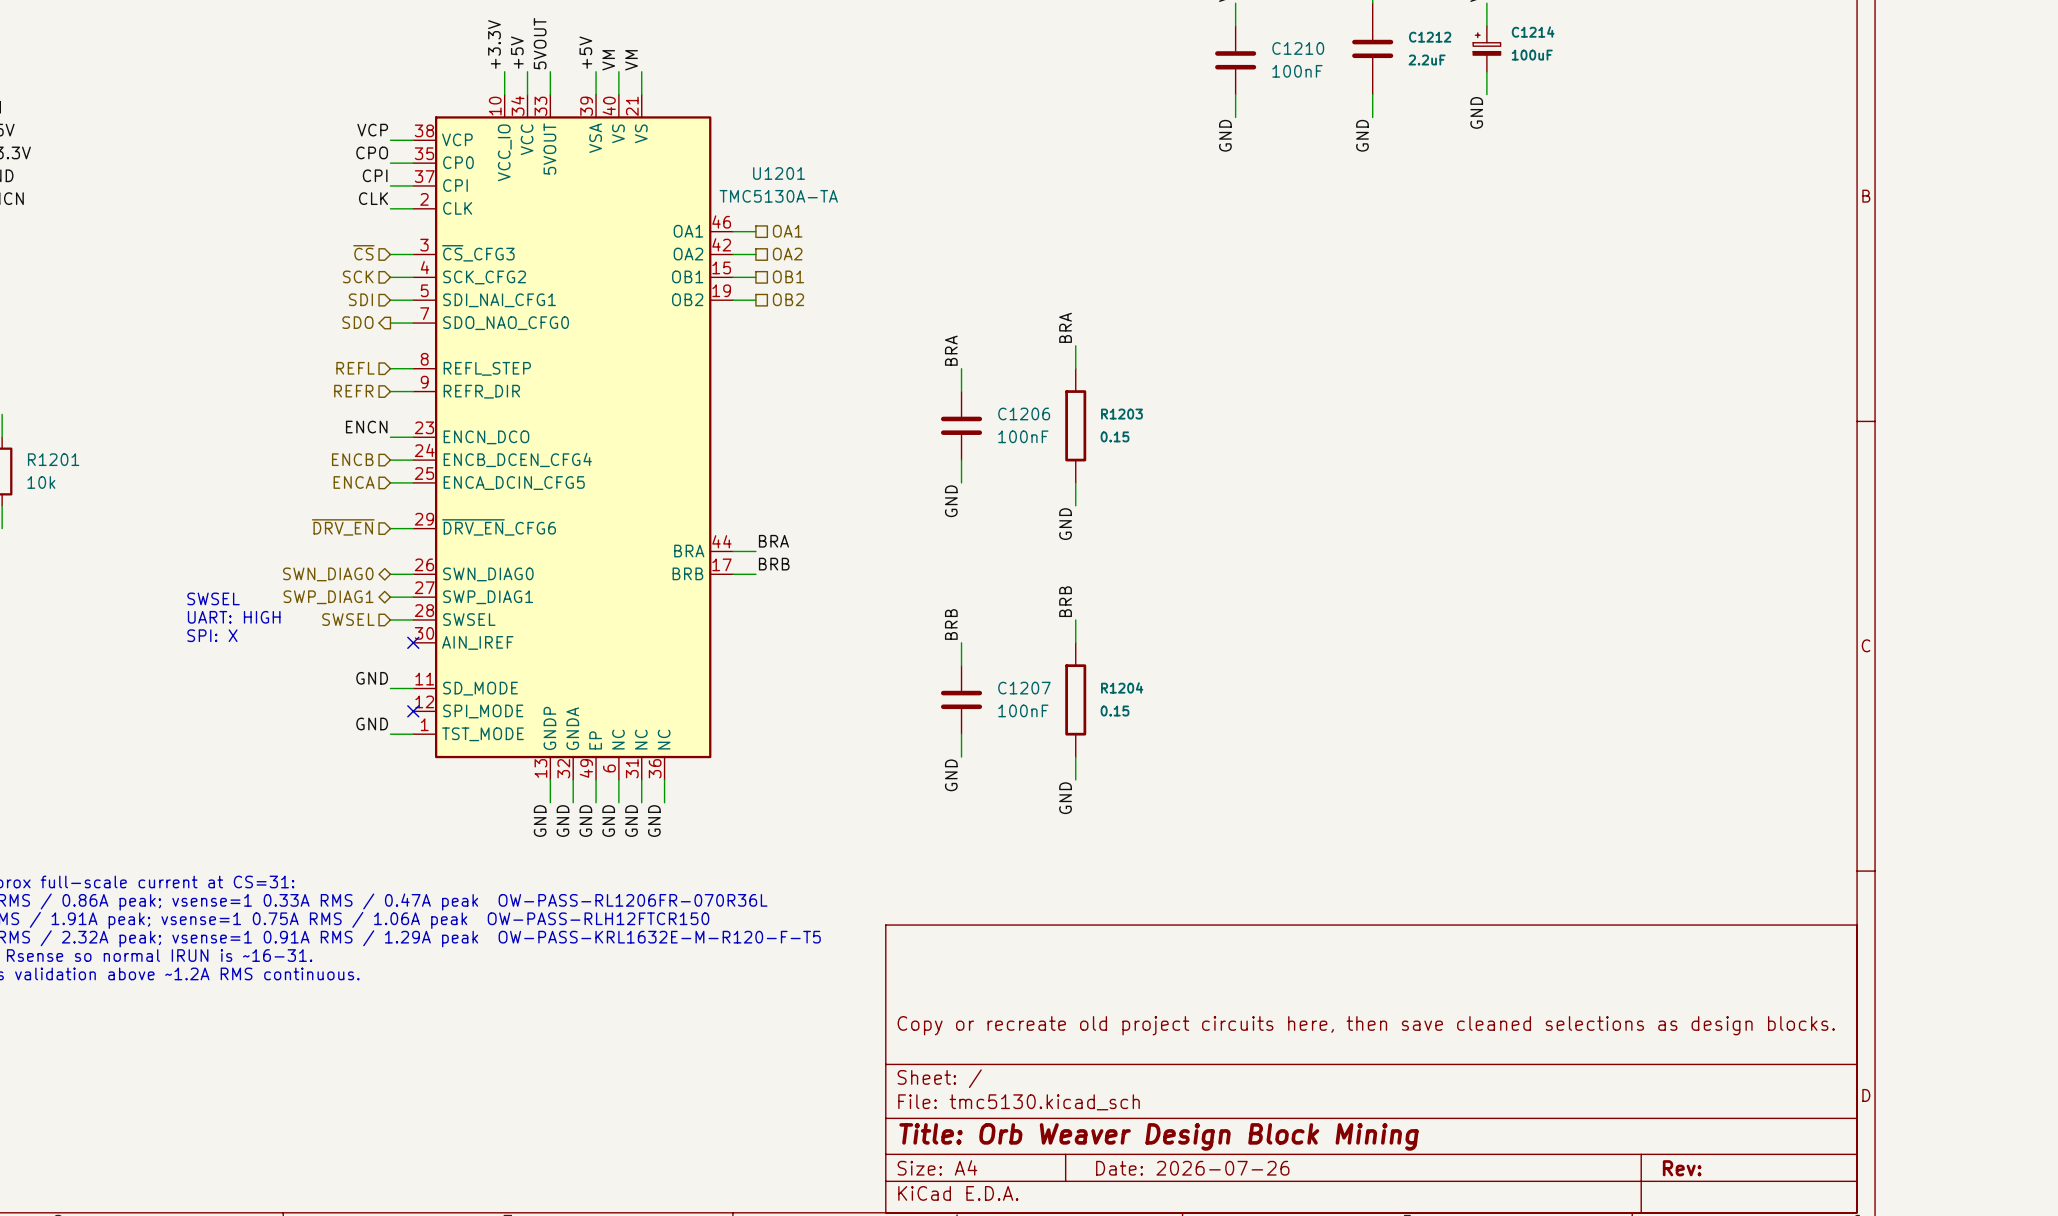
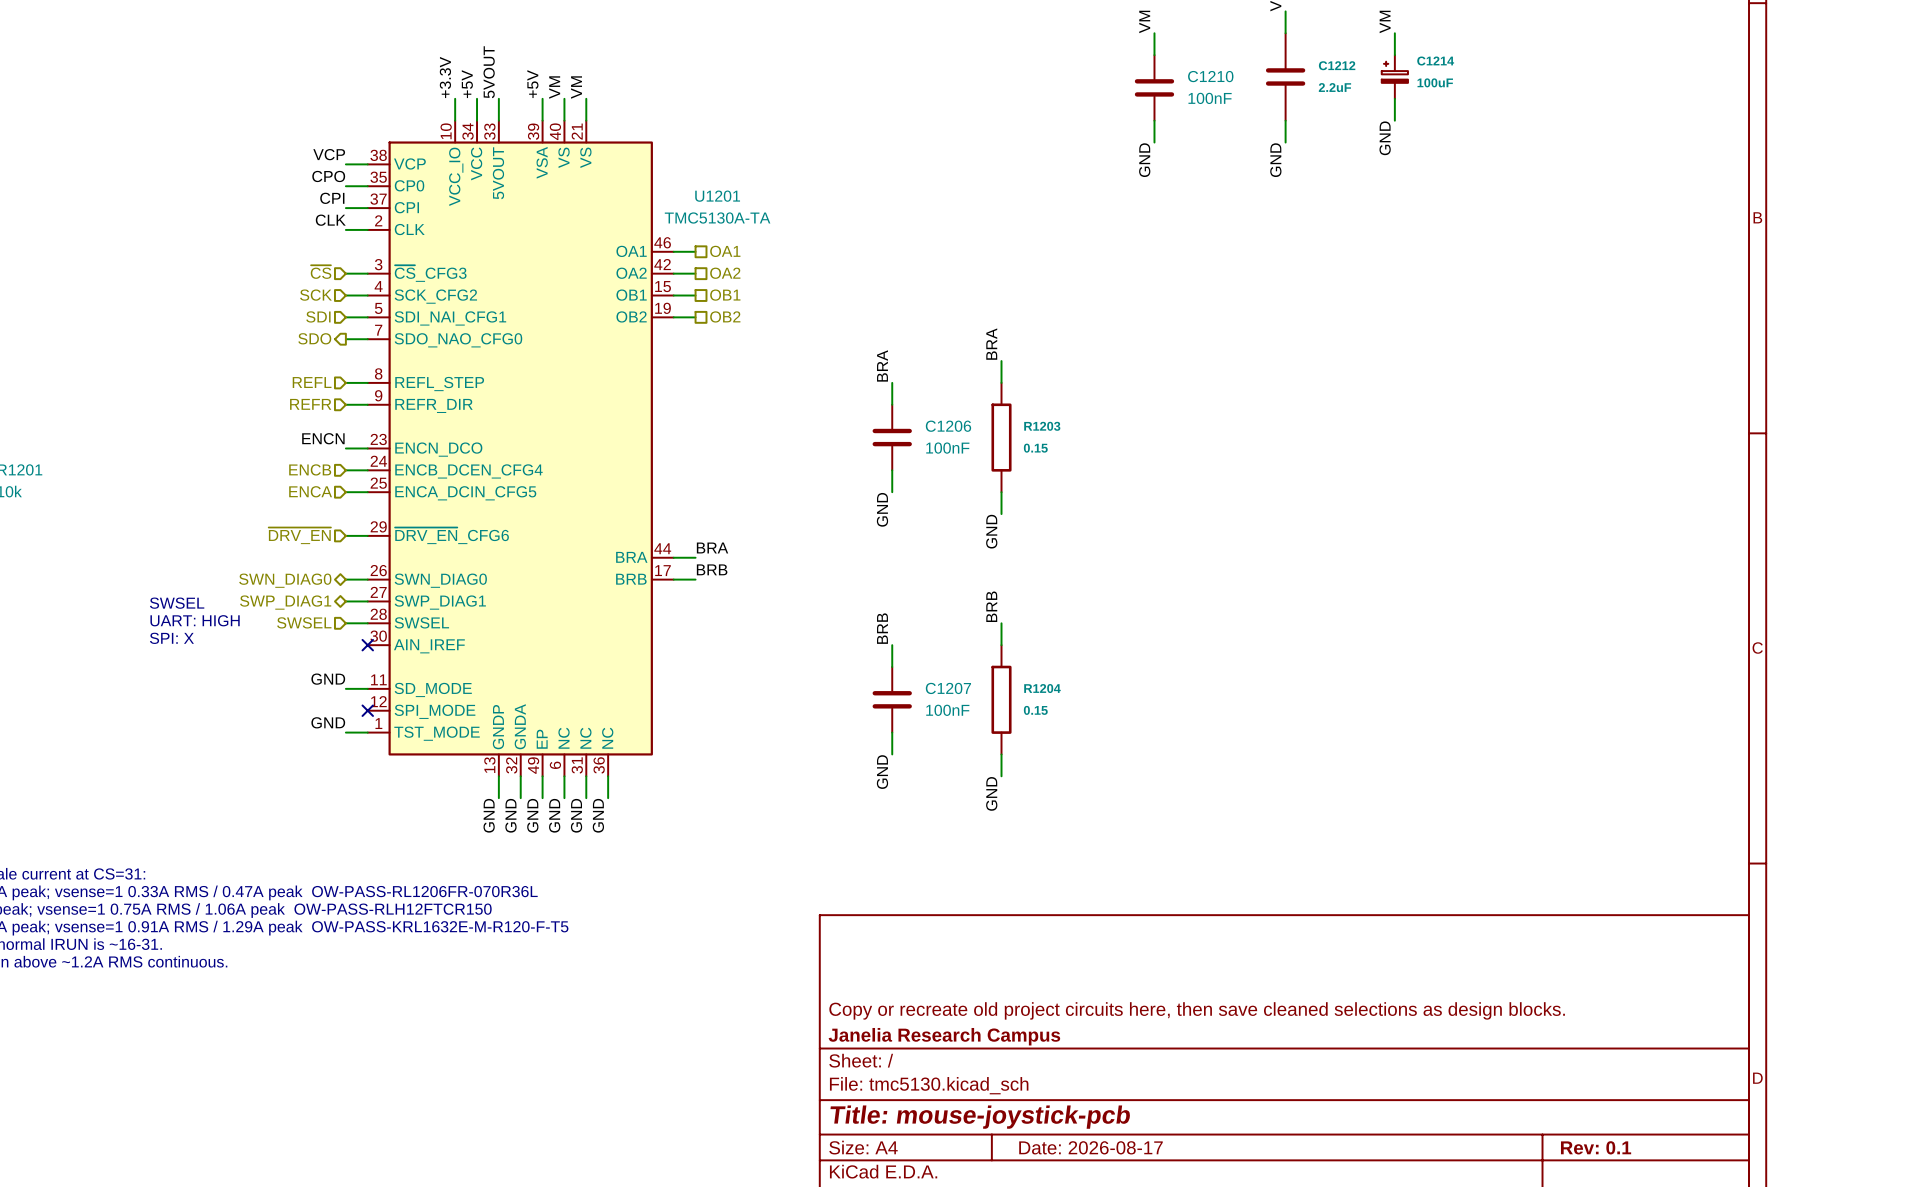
title block: none -> Janelia Research Campus (944, 1036)
title block: Title: Orb Weaver Design Block Mining (1158, 1136) -> Title: mouse-joystick-pcb (980, 1117)
title block: Date: 2026-07-26 (1192, 1168) -> Date: 2026-08-17 (1090, 1147)
title block: Rev: (1682, 1168) -> Rev: 0.1 (1596, 1147)

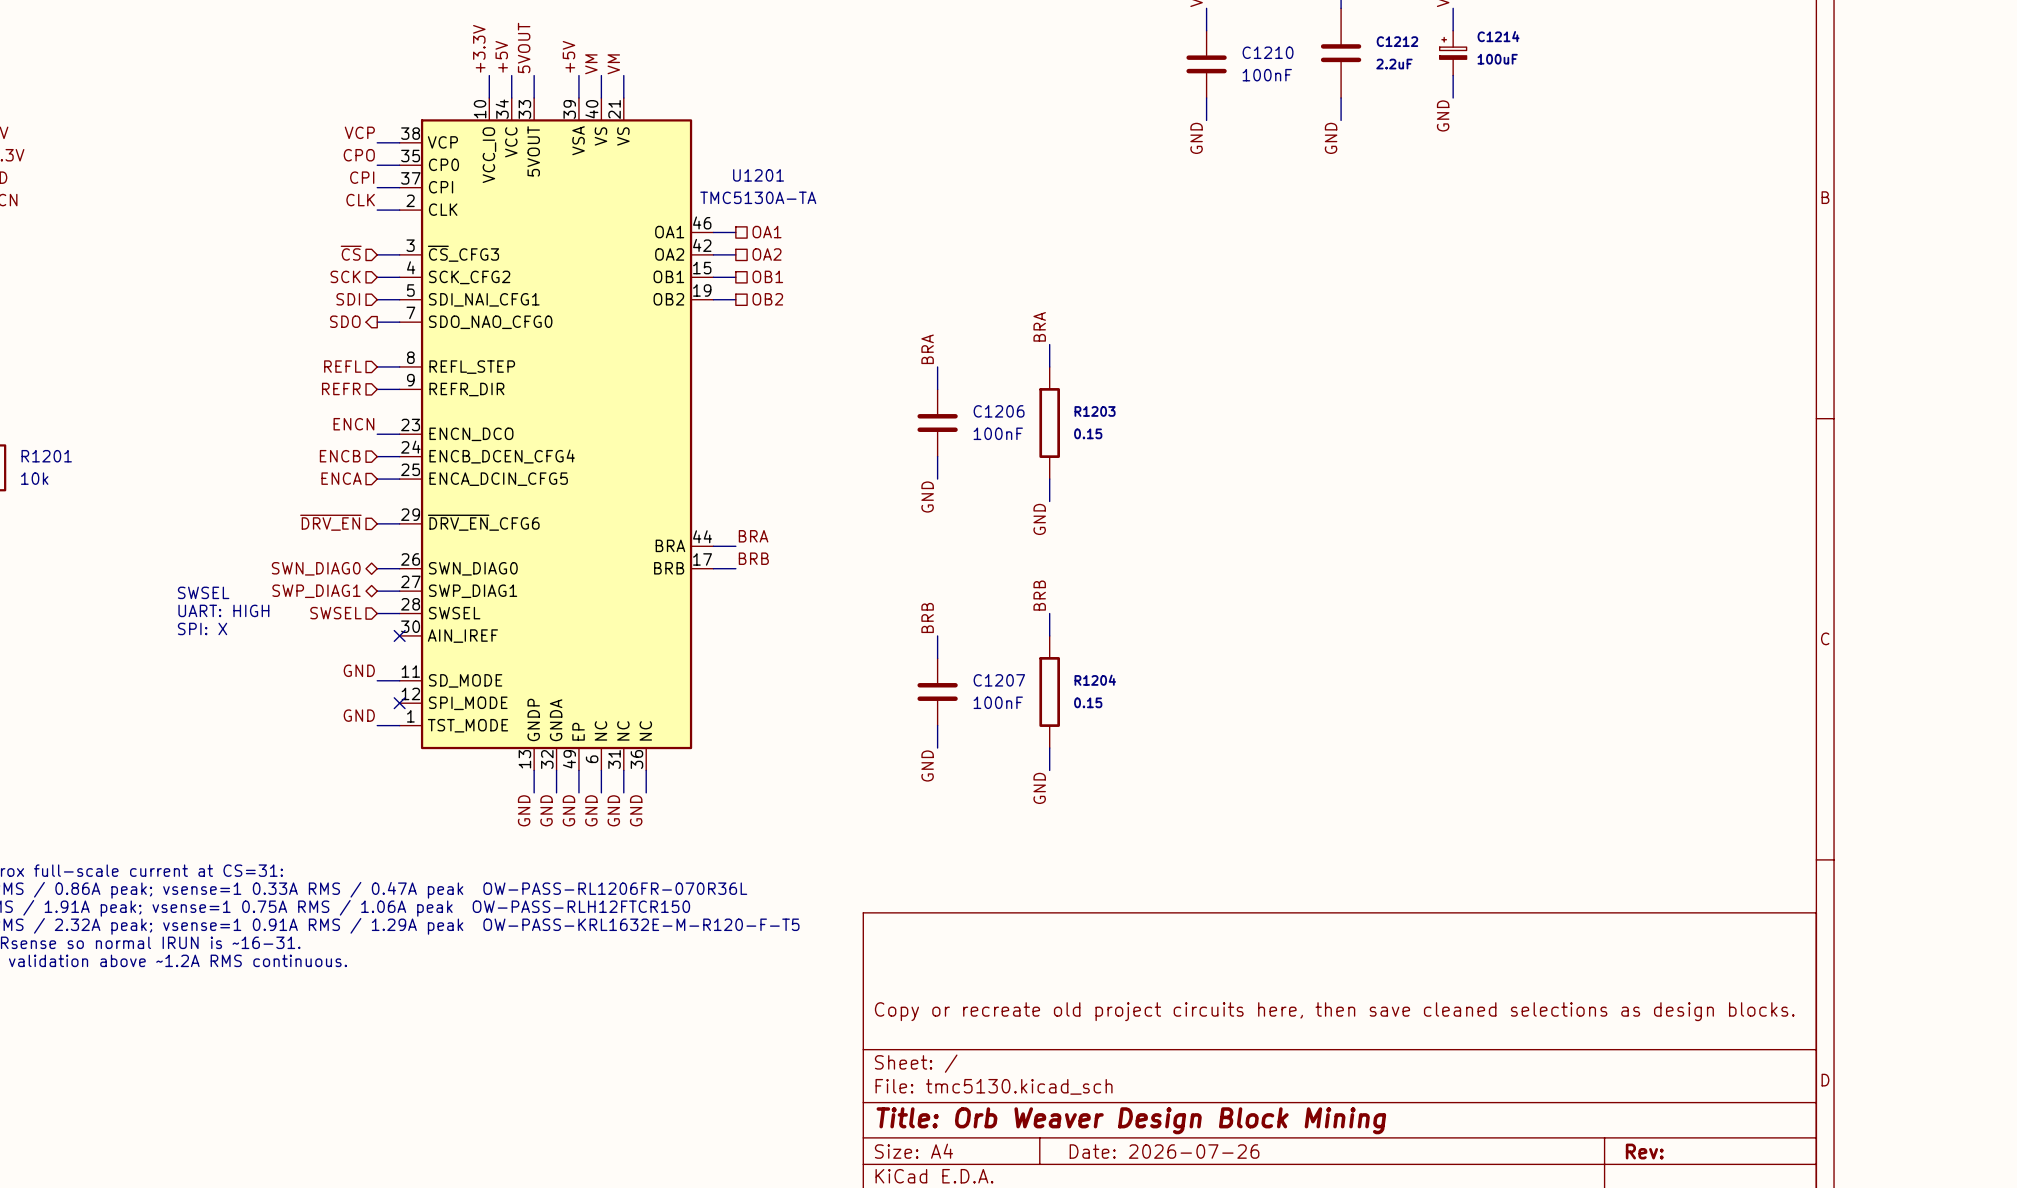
title block: Janelia Research Campus (944, 1036) -> none
title block: Title: mouse-joystick-pcb (980, 1117) -> Title: Orb Weaver Design Block Mining (1131, 1120)
title block: Date: 2026-08-17 (1090, 1147) -> Date: 2026-07-26 (1164, 1151)
title block: Rev: 0.1 (1596, 1147) -> Rev: (1644, 1151)

